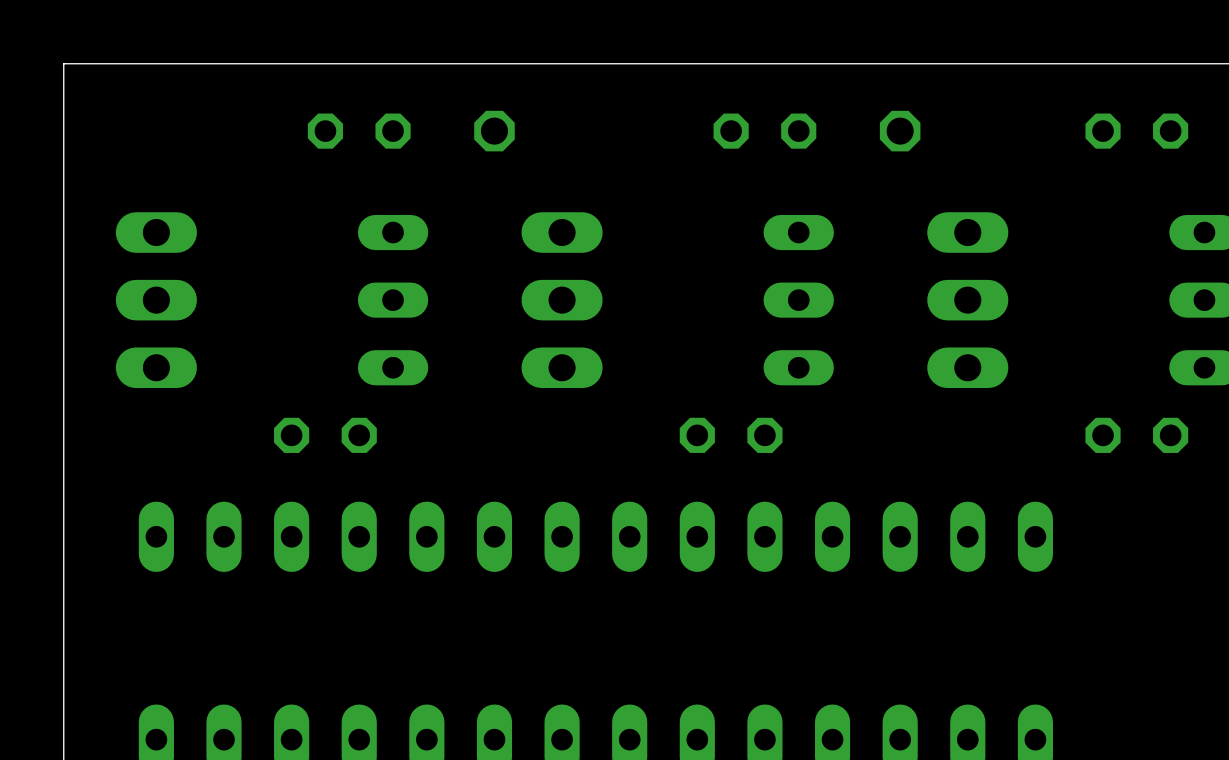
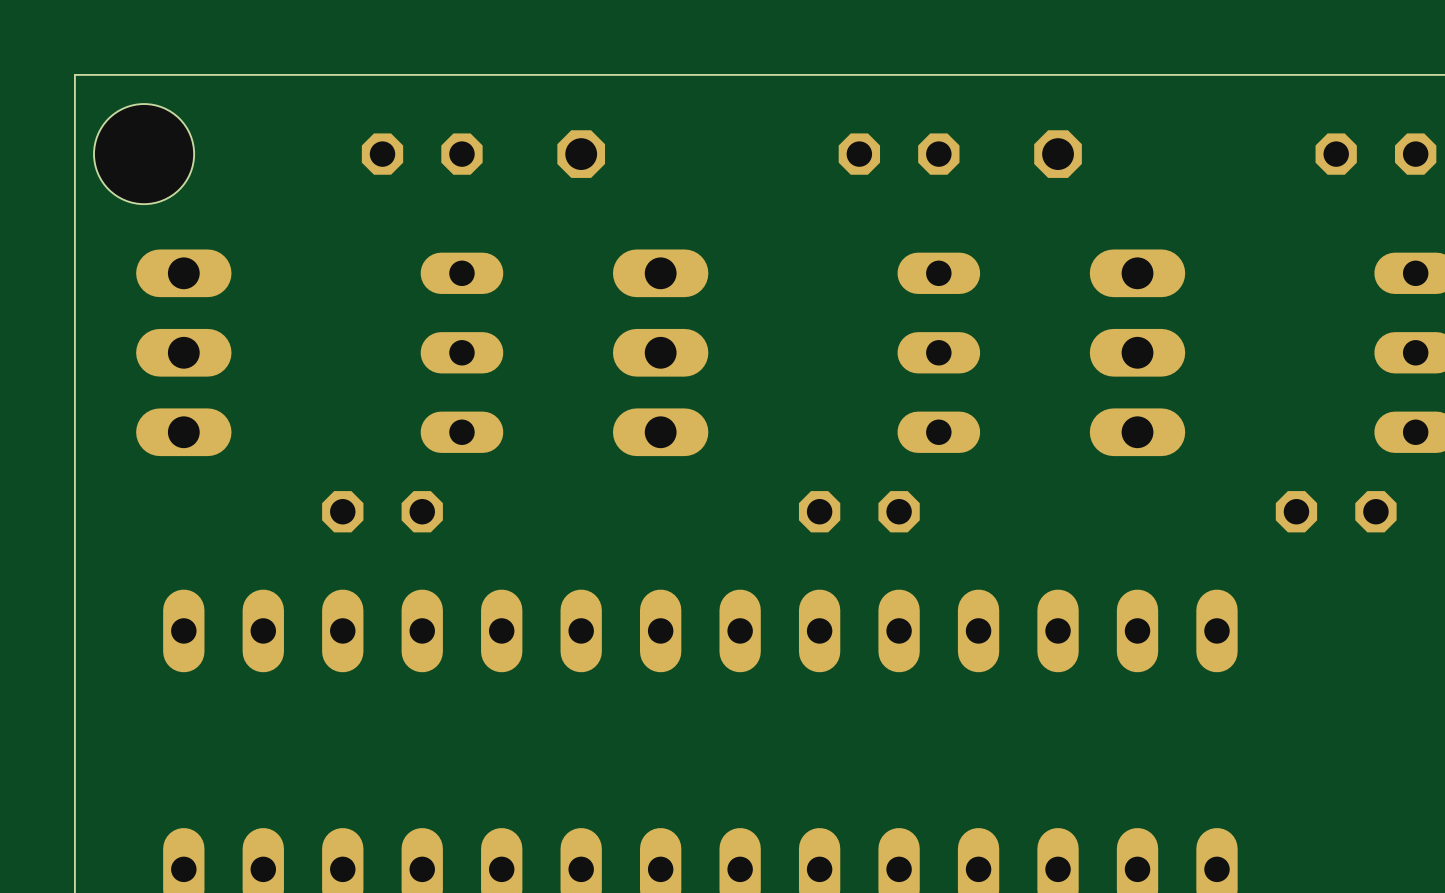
hole: none -> (144, 154)
part position: (1136, 131) -> (1375, 154)

